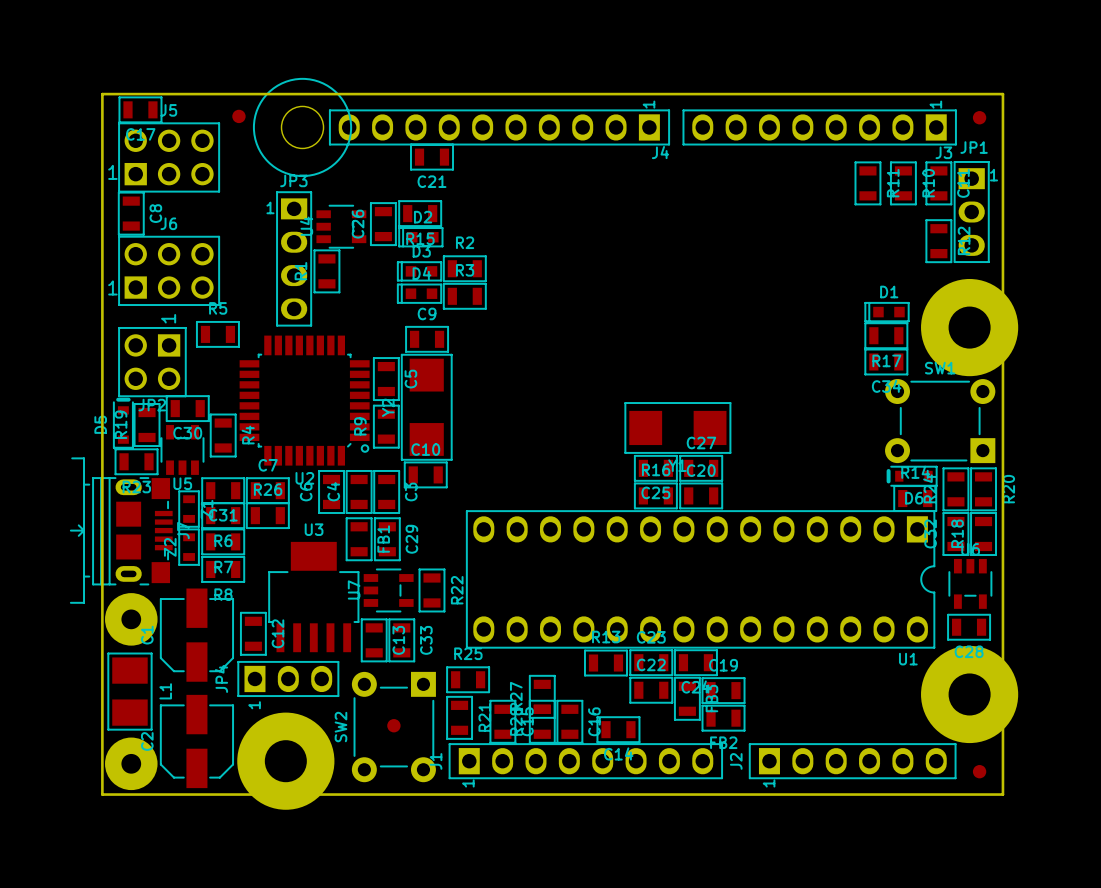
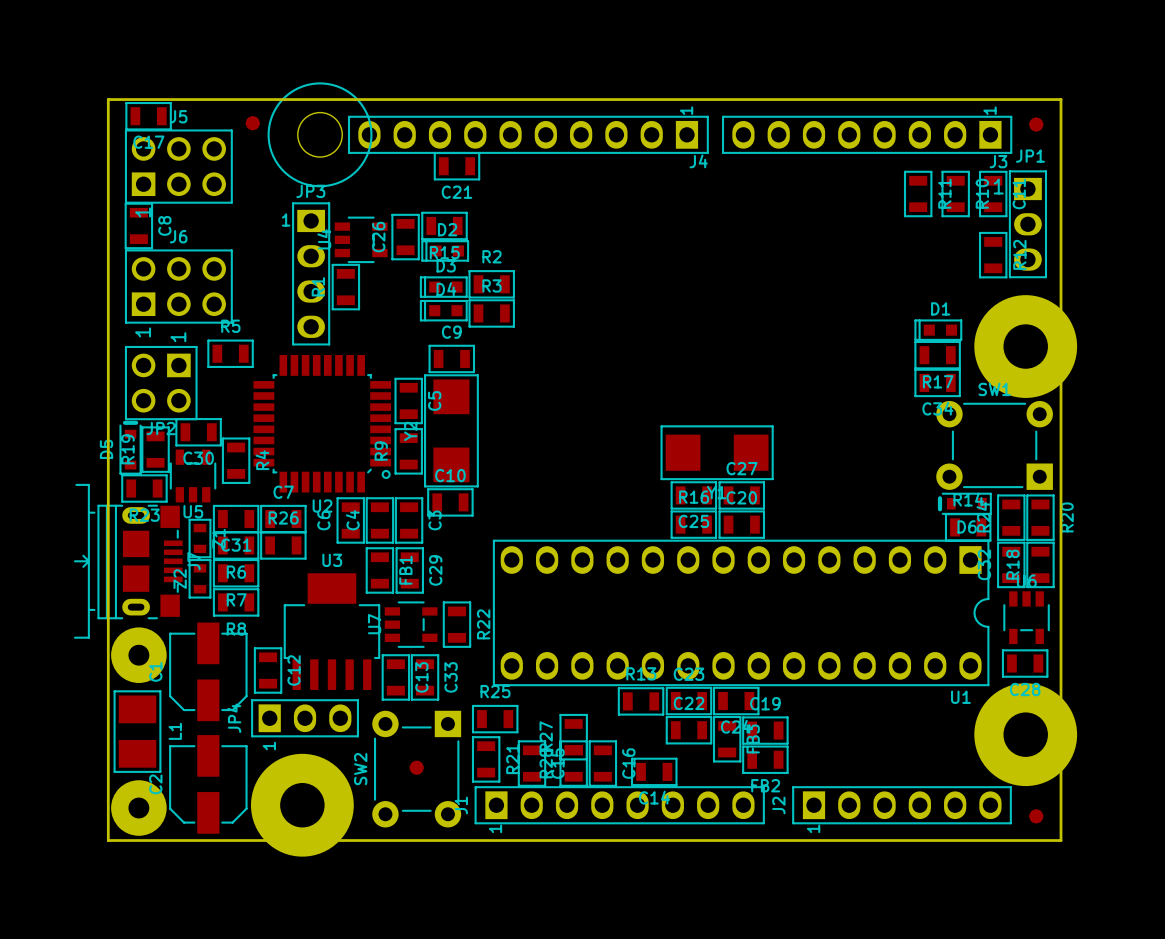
J5 text rotation: 0° (112, 172) -> 90° counterclockwise (143, 212)
J5 text position: 1 (112, 172) -> 1 (143, 212)
JP1 text position: 1 (994, 175) -> 1 (998, 186)
J6 text rotation: 0° (112, 287) -> 90° counterclockwise (143, 332)
J6 text position: 1 (112, 287) -> 1 (143, 332)

